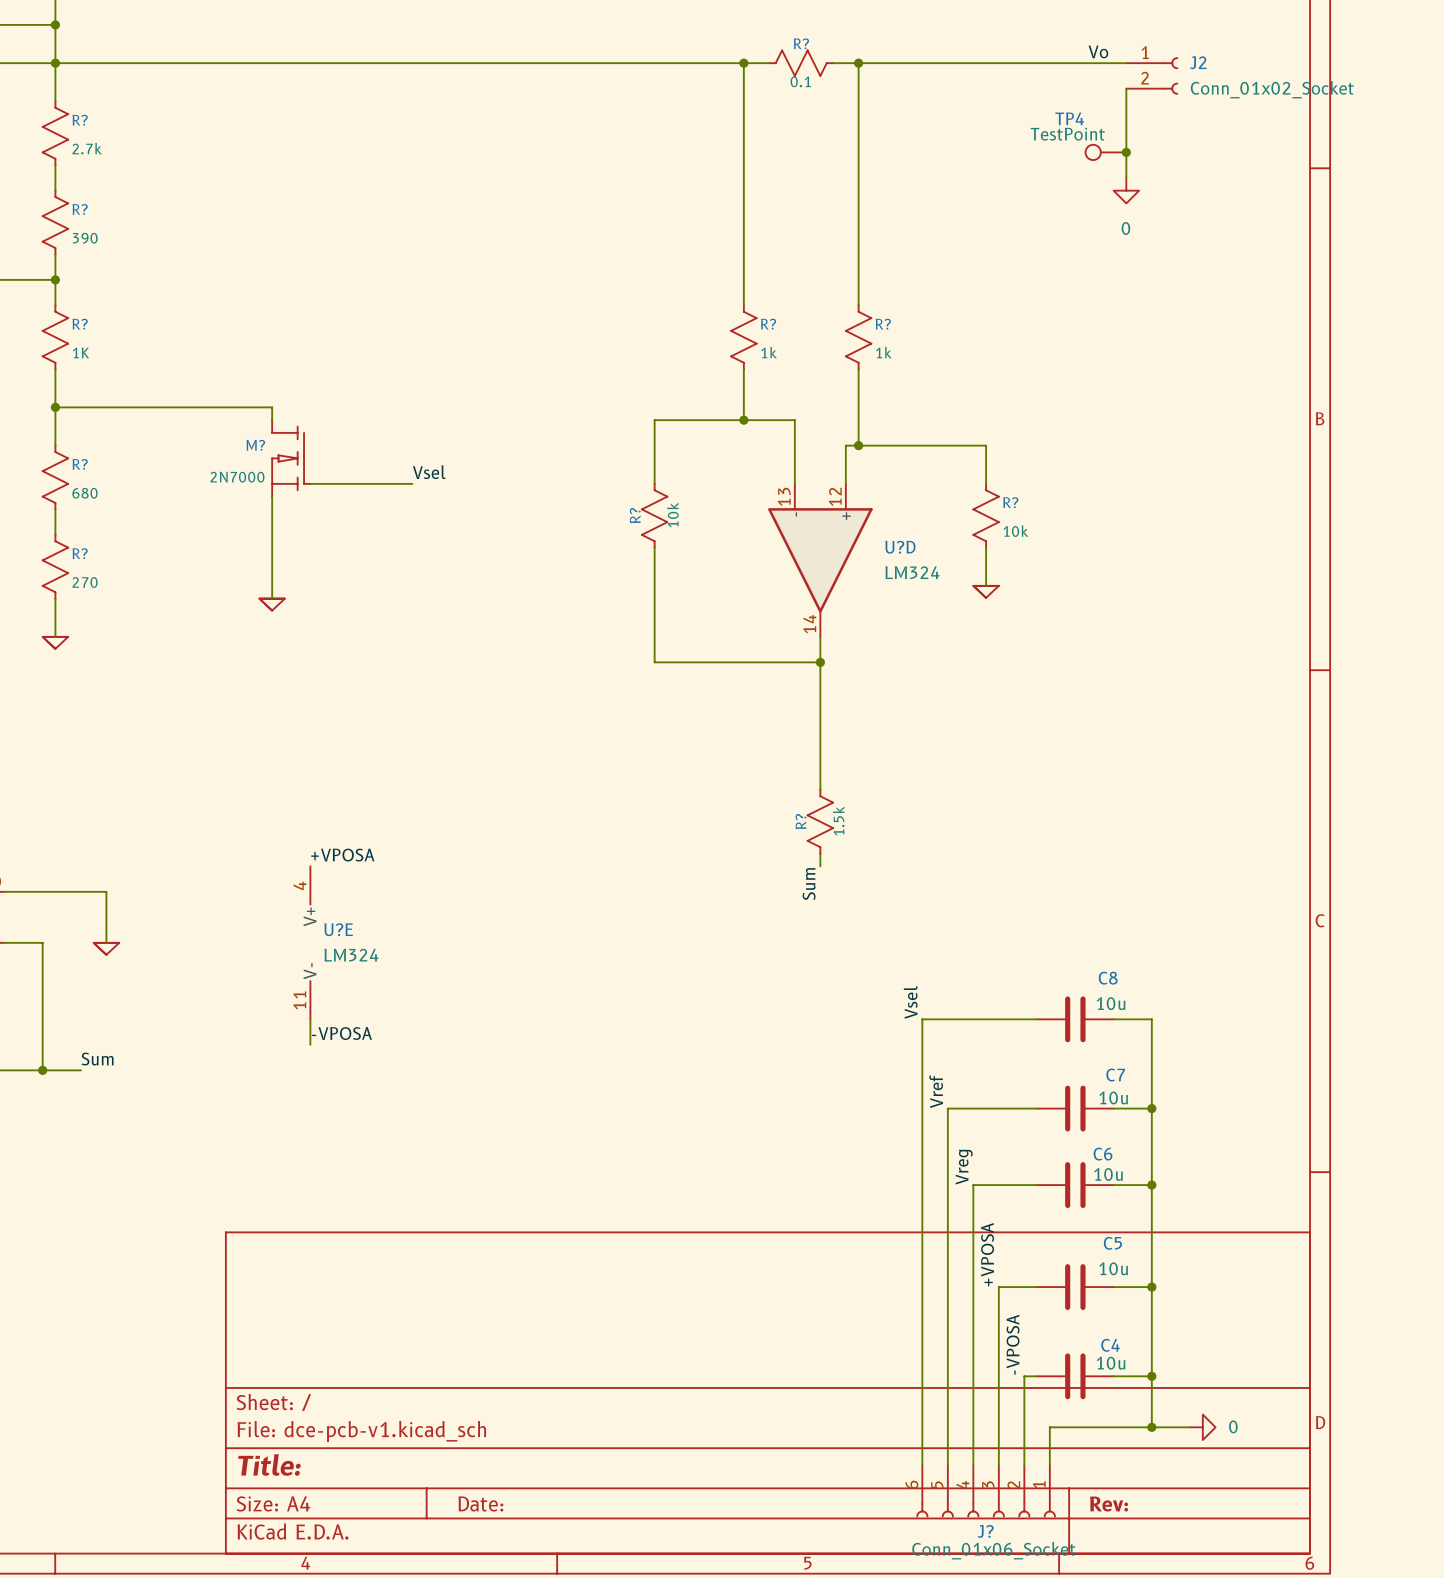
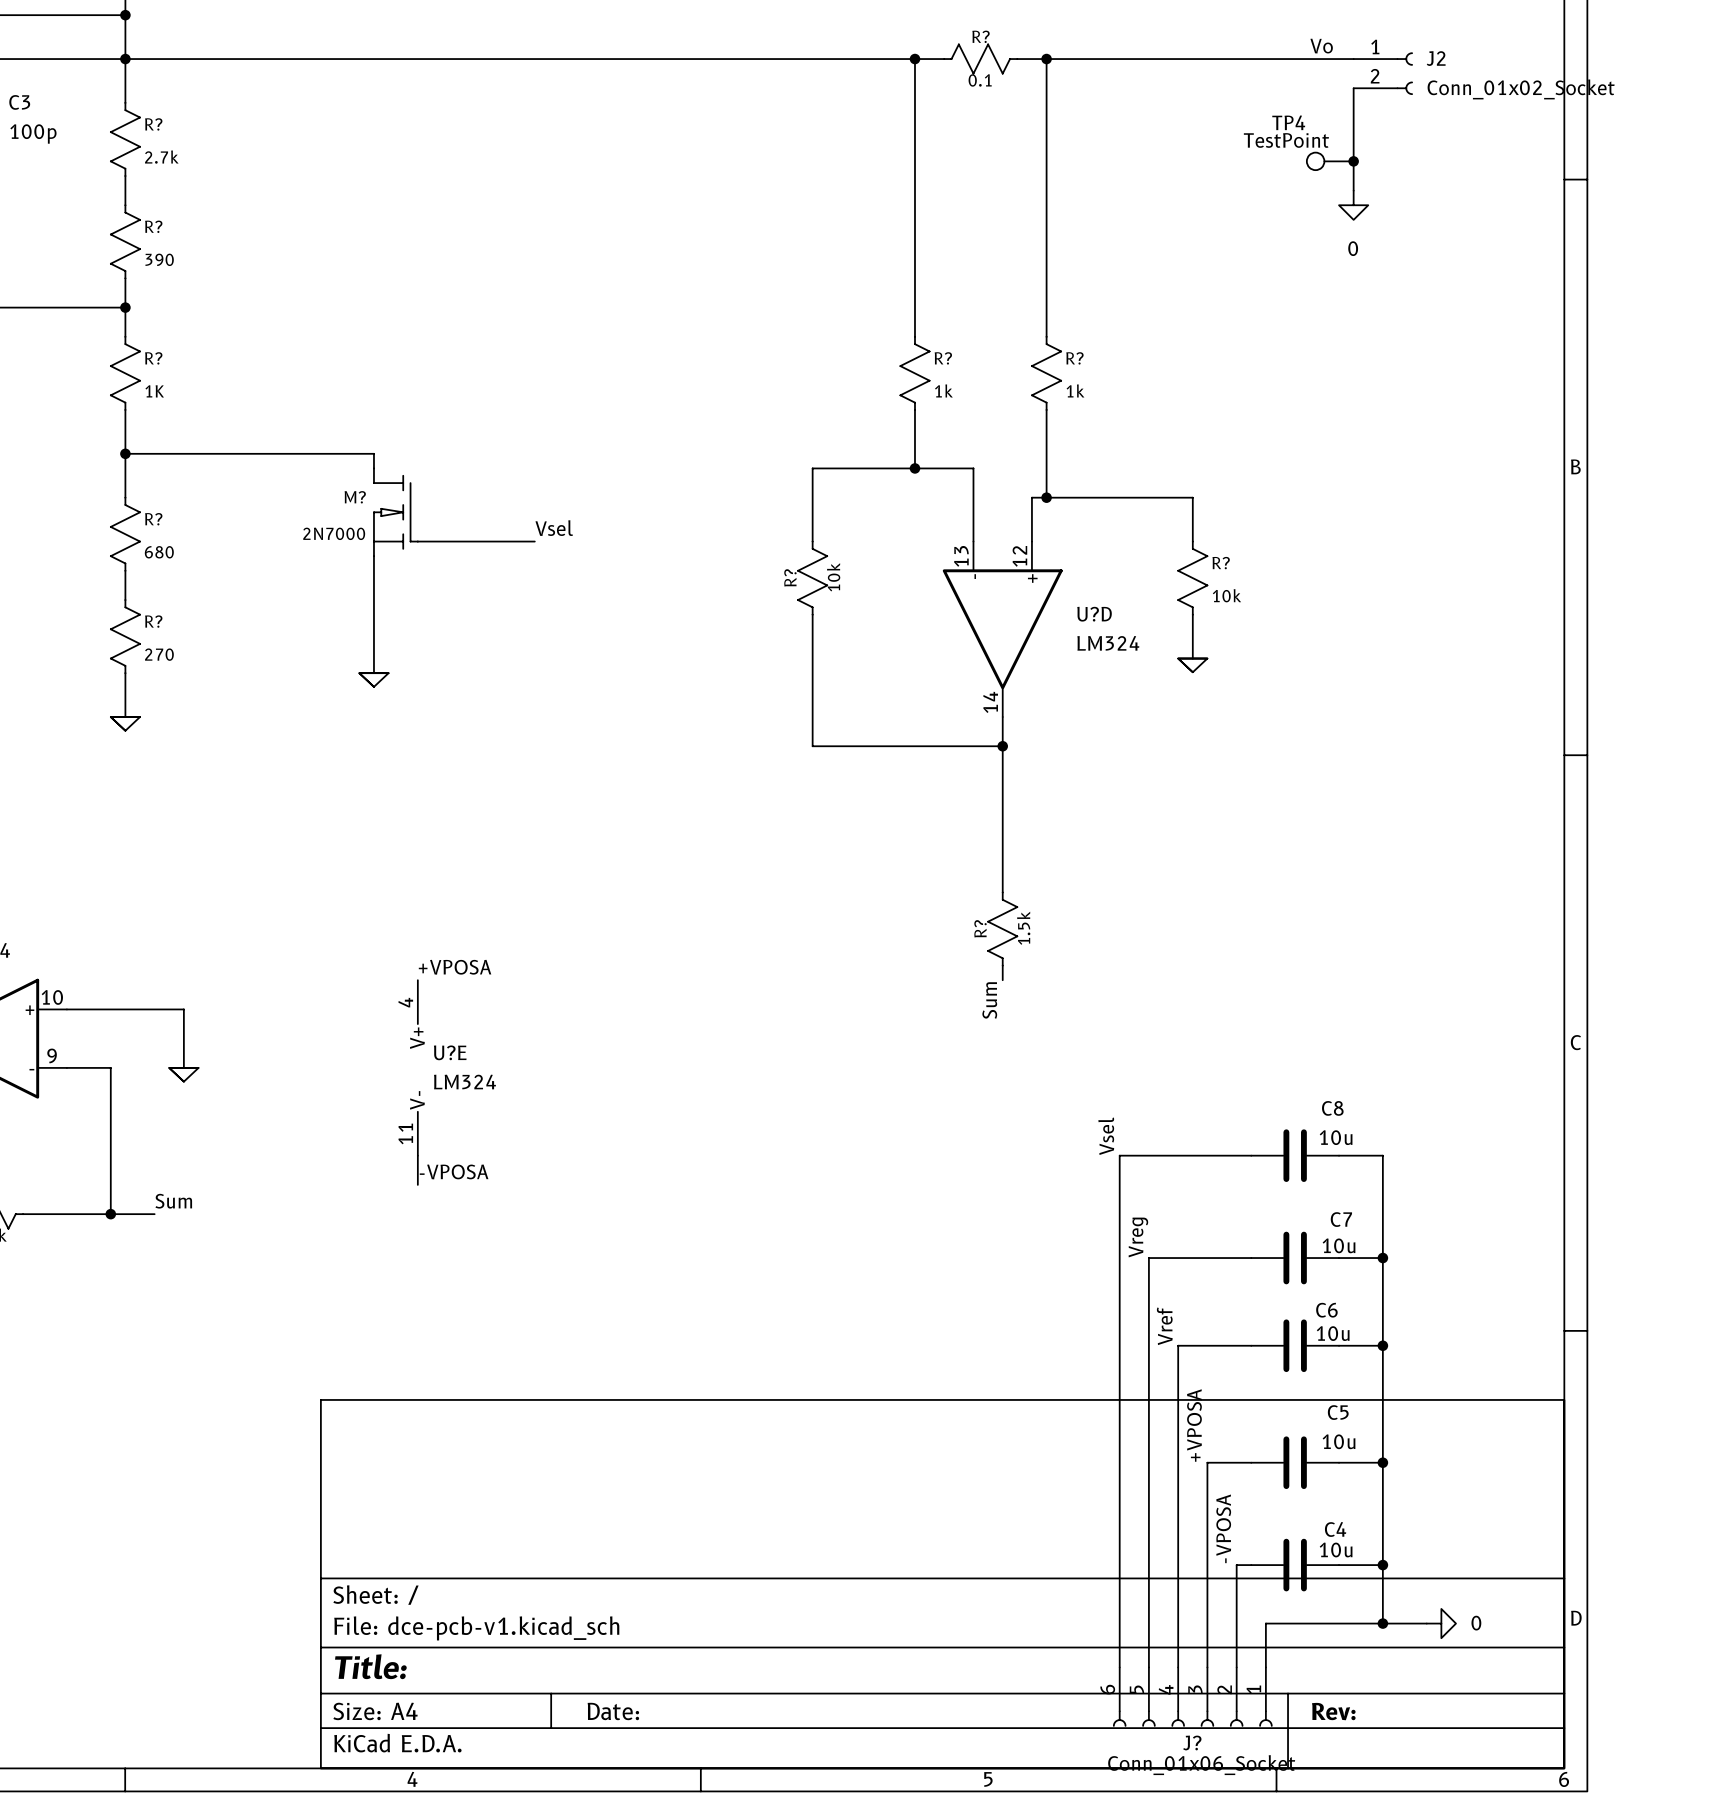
label: Vref (936, 1091) -> Vreg (1138, 1237)
label: Vreg (964, 1167) -> Vref (1164, 1326)

